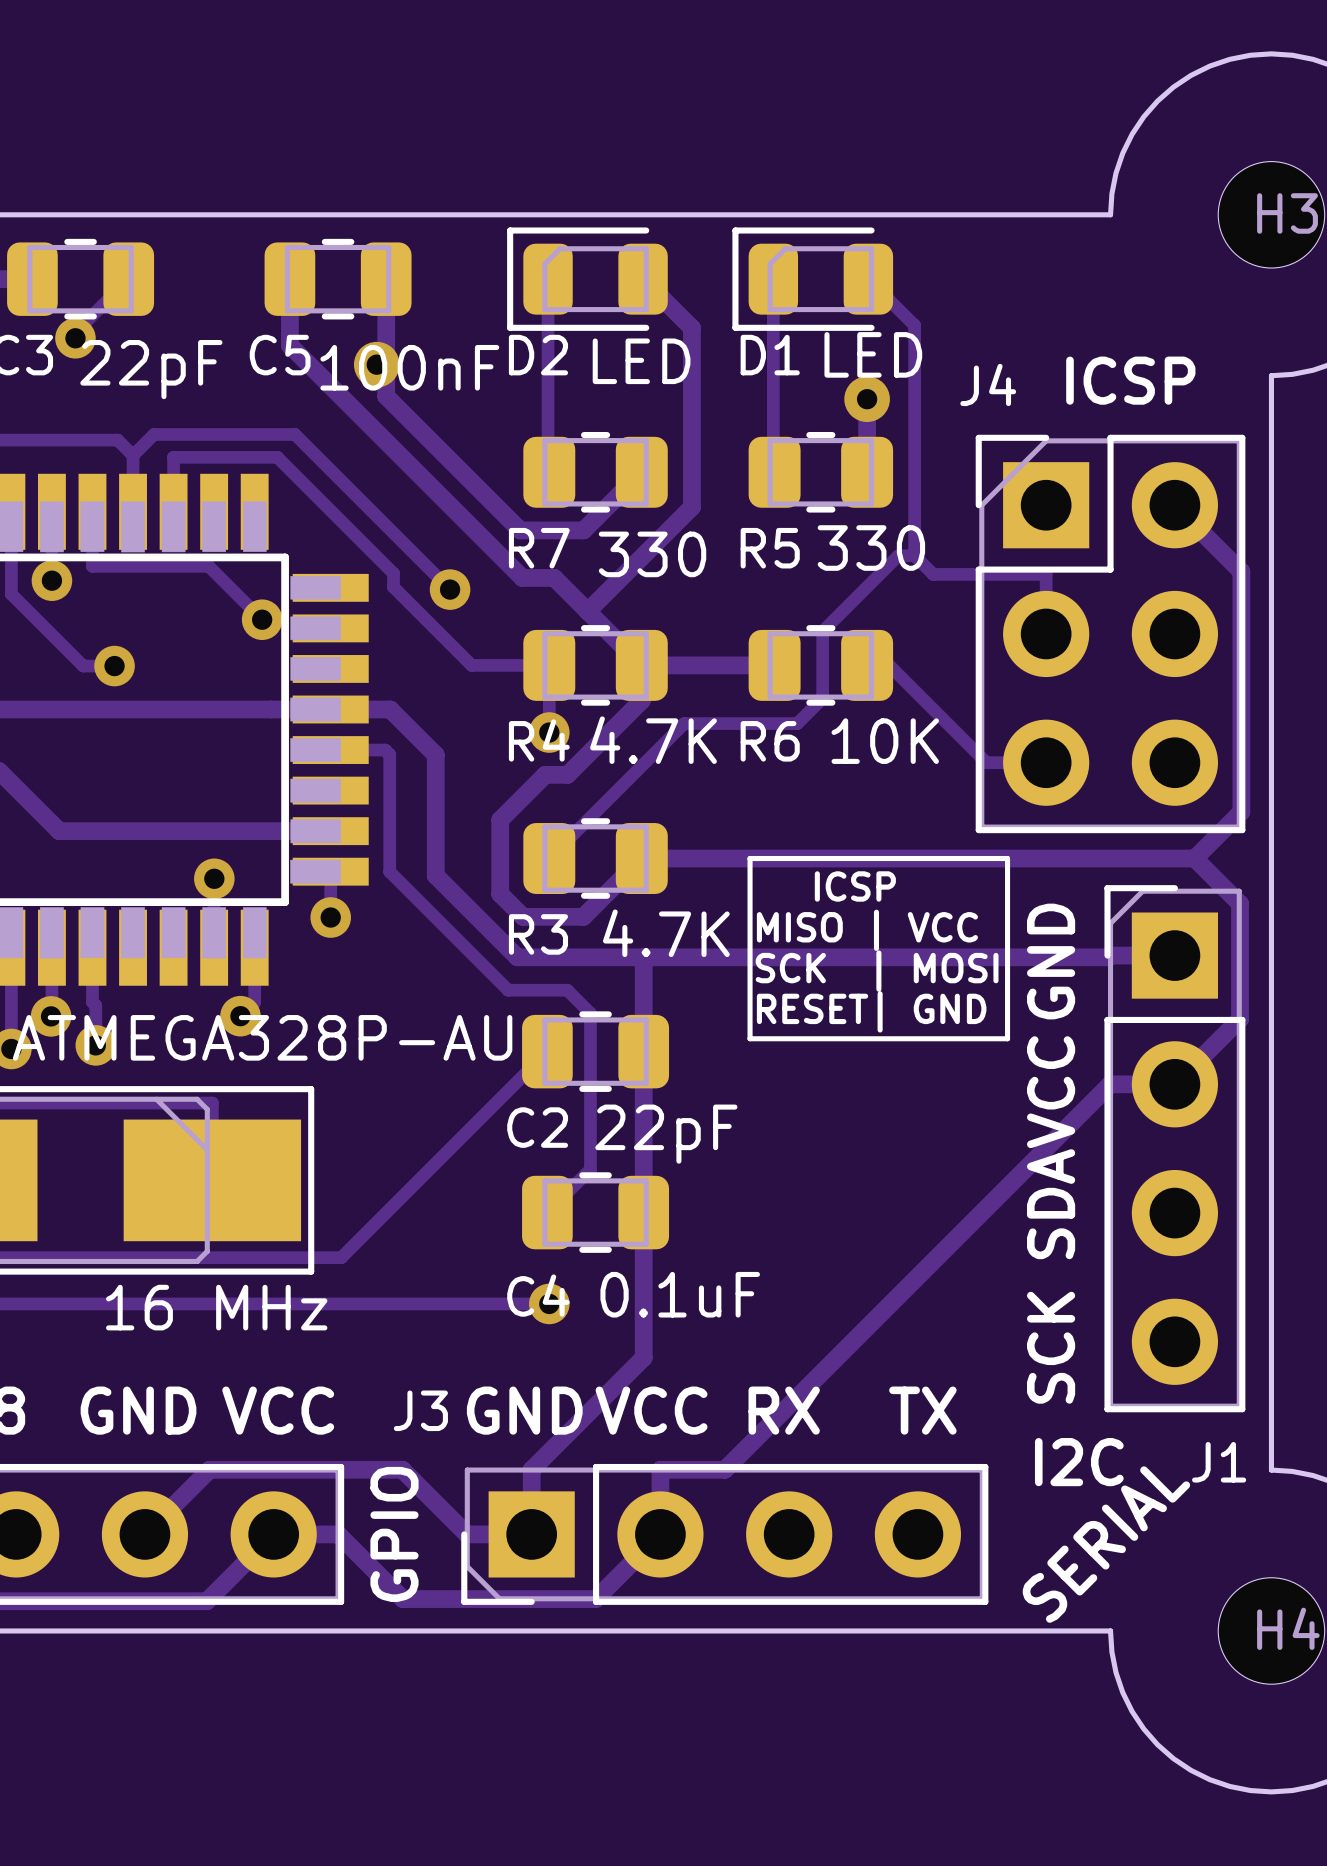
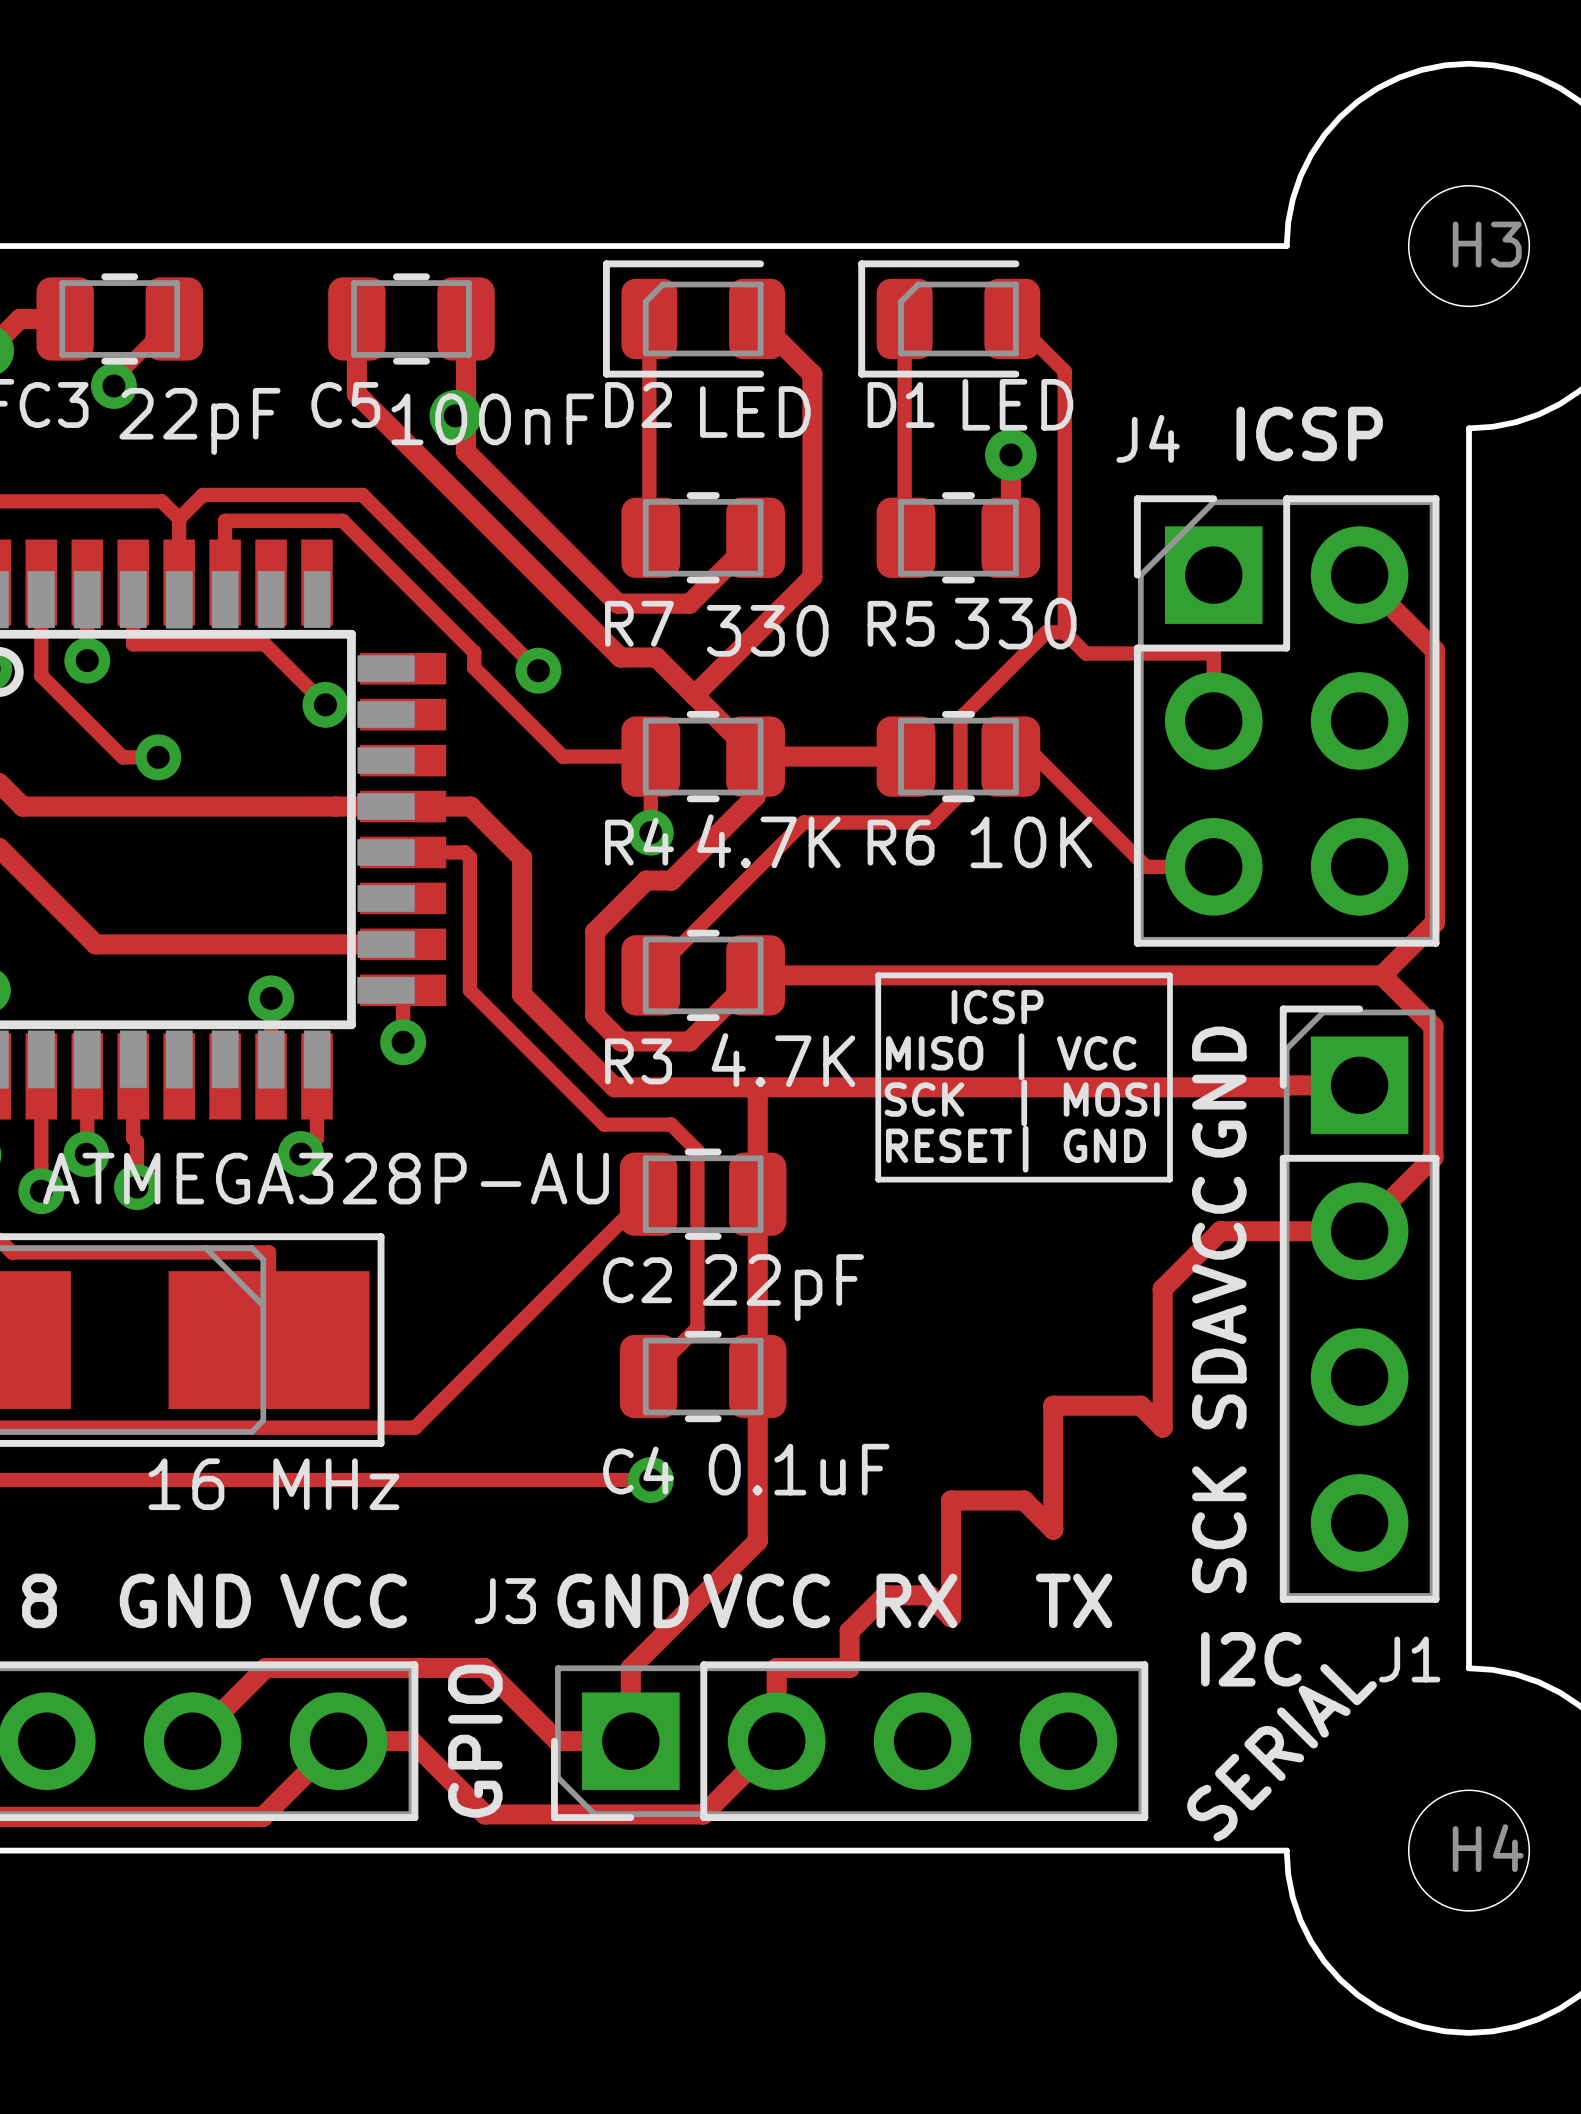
track: (1110, 1084) (724, 1469) -> (1286, 1231) (1220, 1231) (1162, 1289) (1162, 1427) (1140, 1405) (1053, 1405) (1053, 1529) (1024, 1500) (951, 1500) (951, 1617) (929, 1595) (885, 1595) (849, 1631) (849, 1667)

